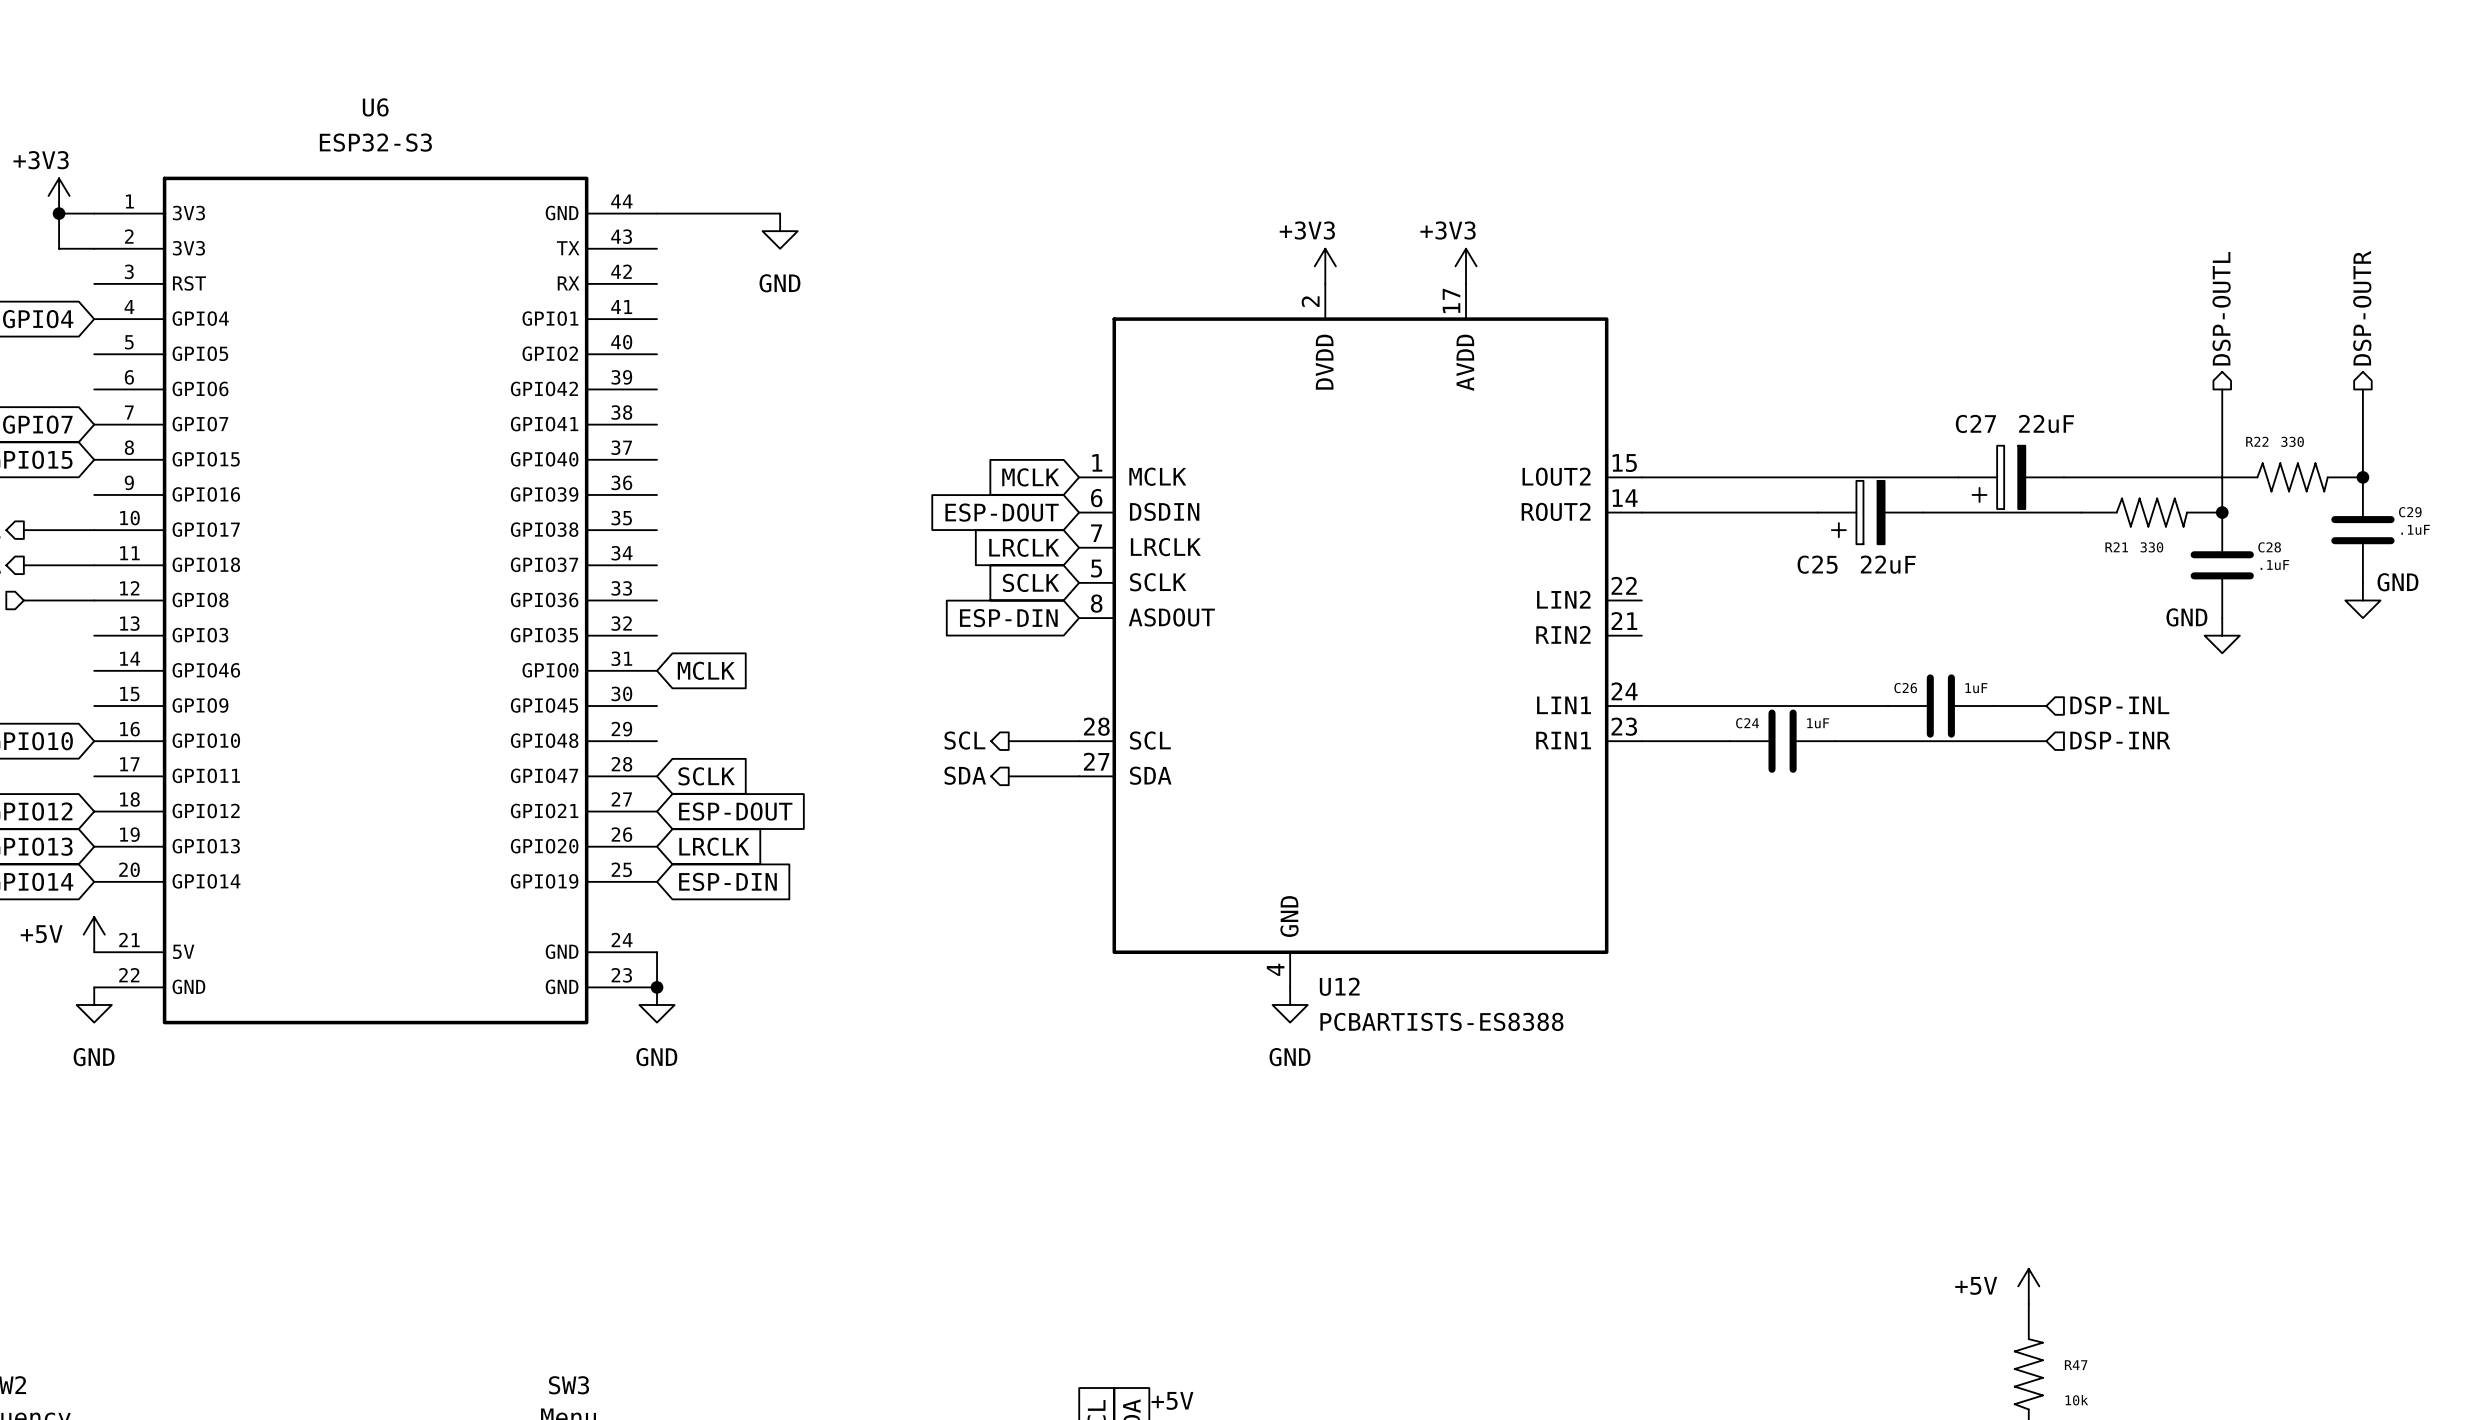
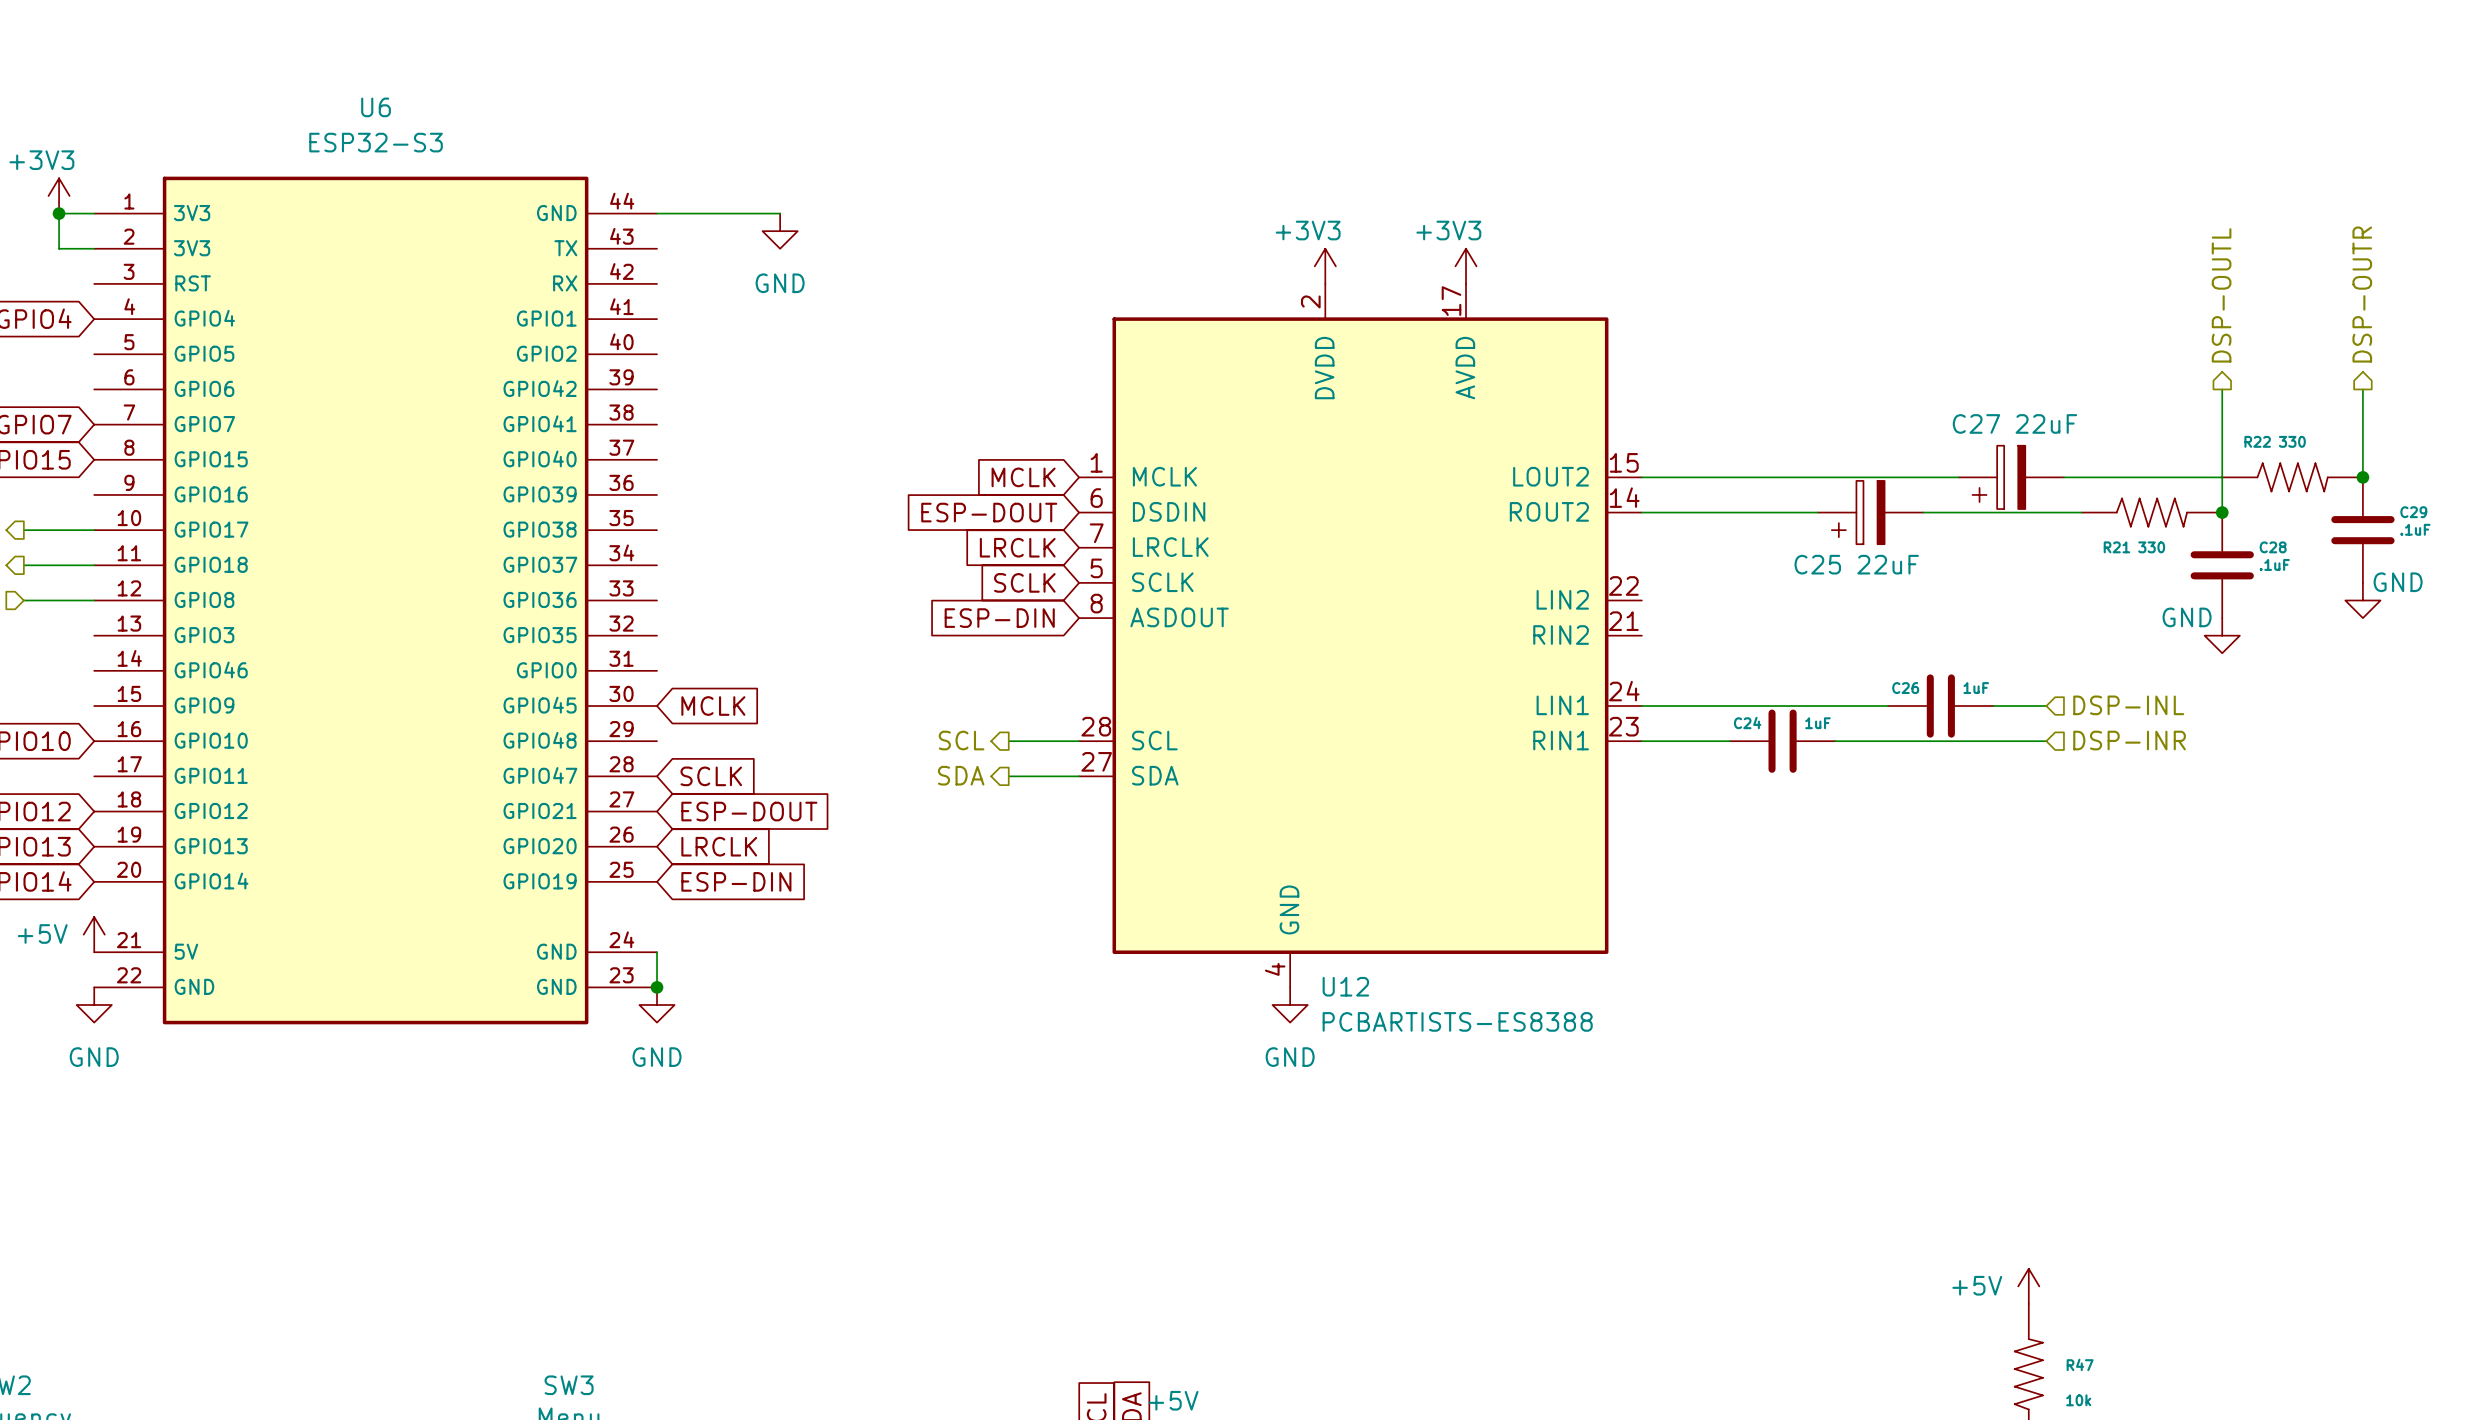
global label position: MCLK (706, 670) -> MCLK (713, 706)

